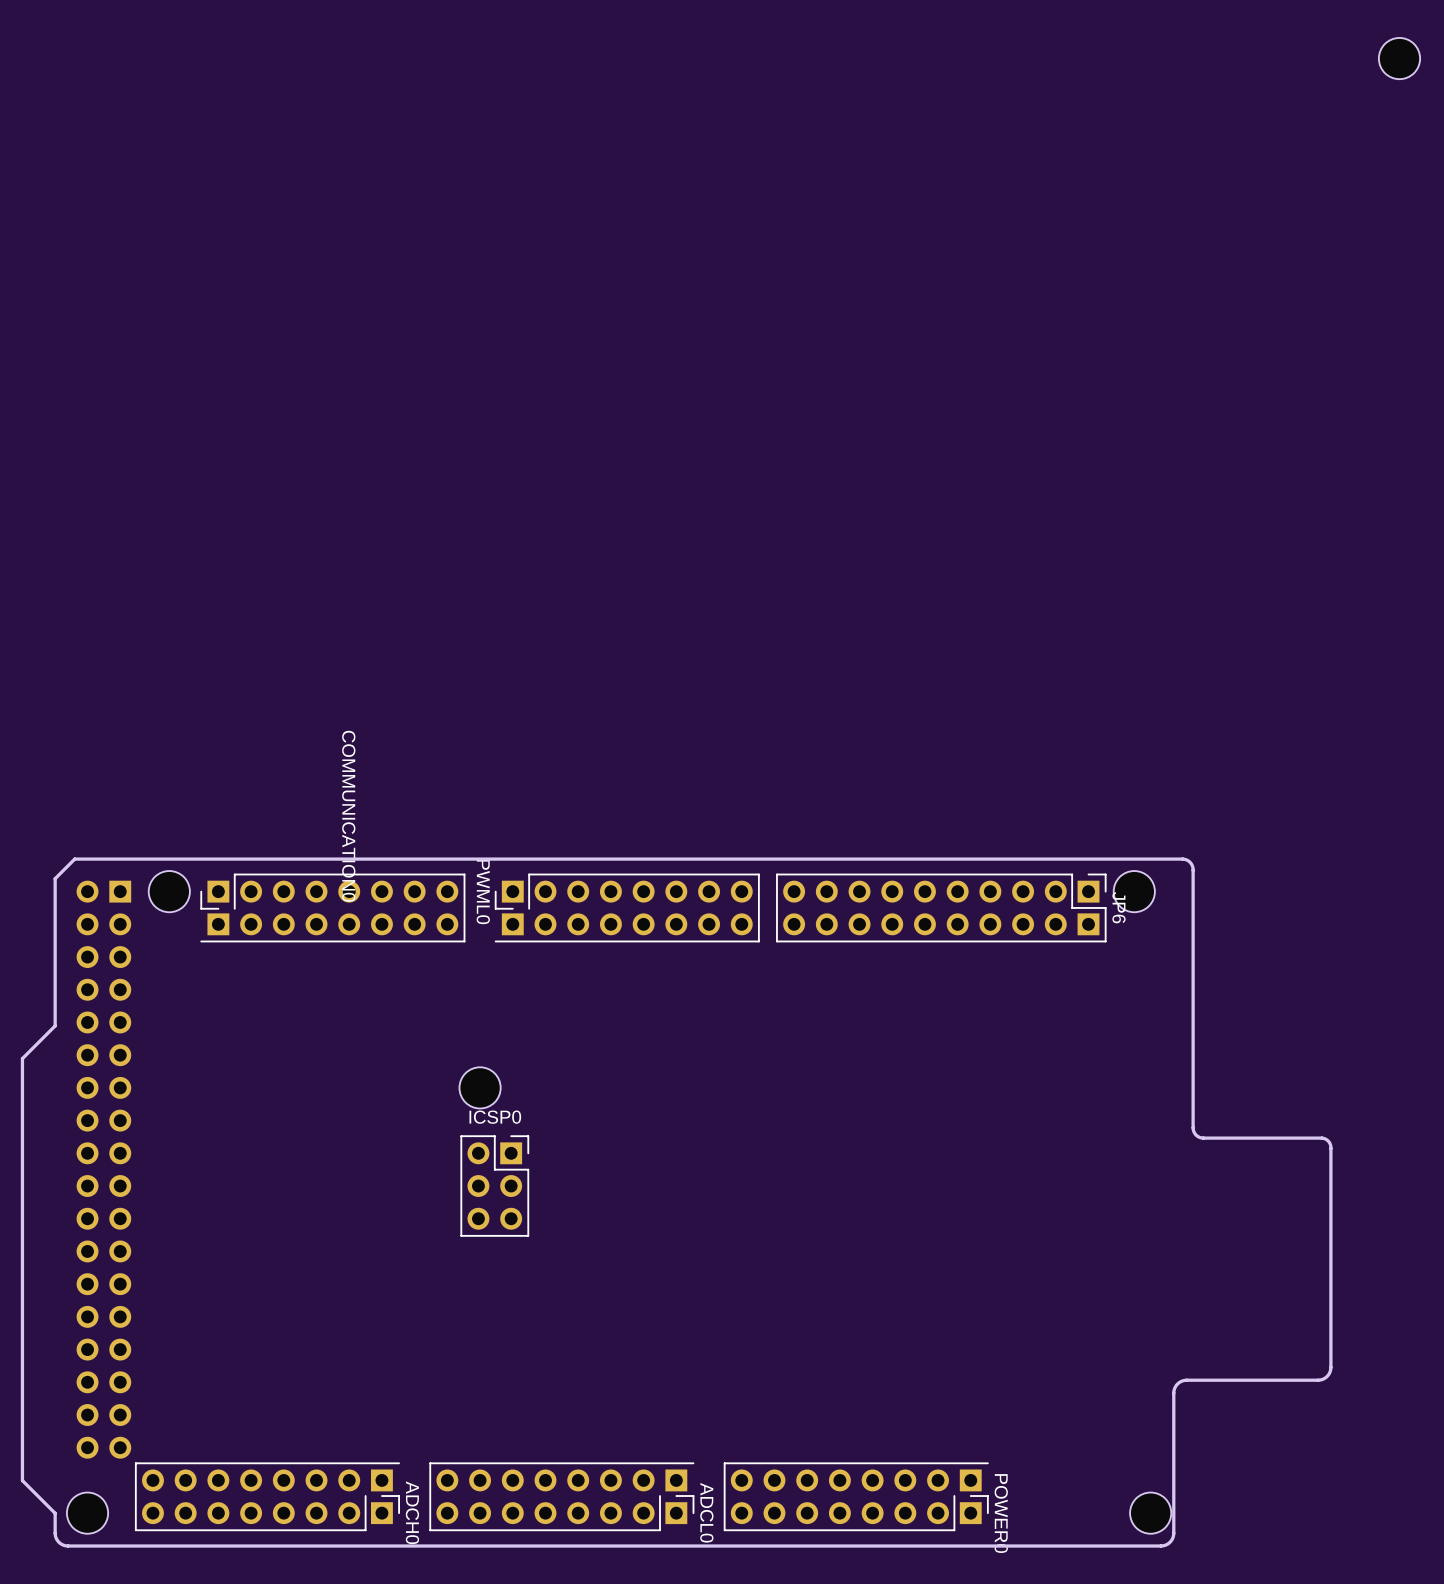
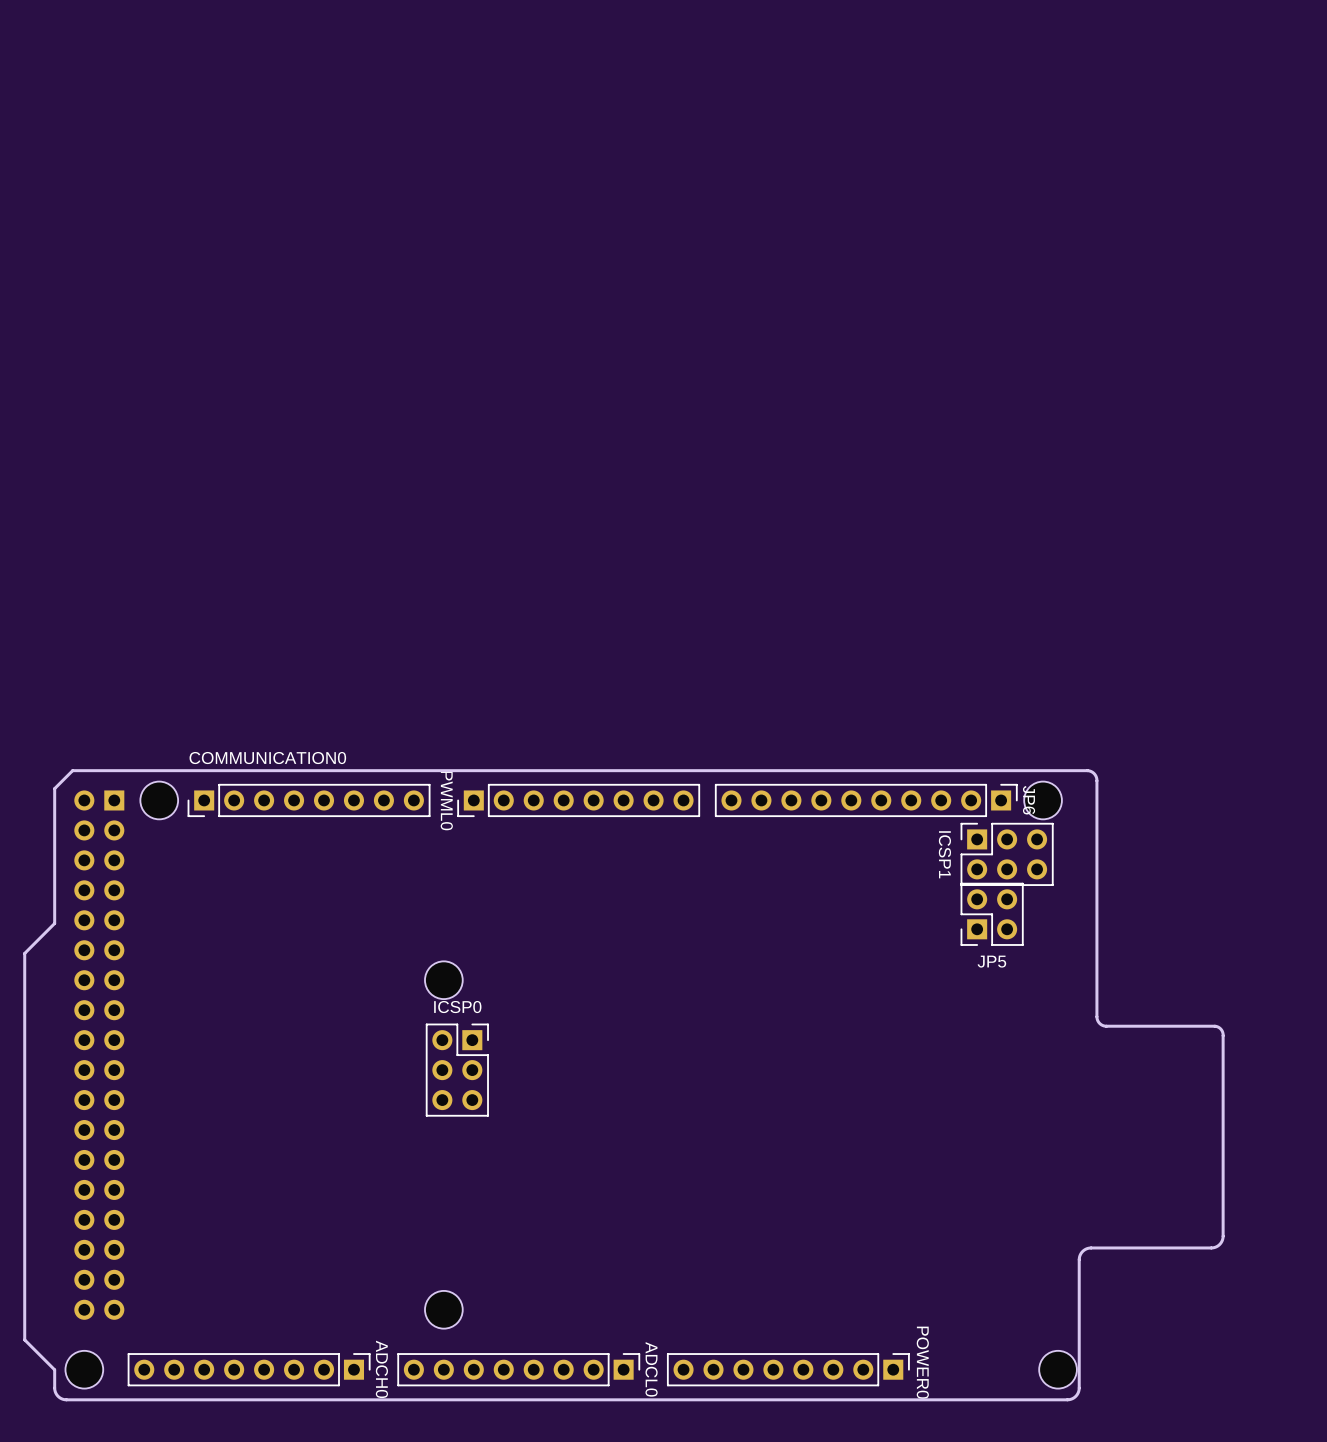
part: (1399, 58) -> none
COMMUNICATION0 name position: COMMUNICATION0 (348, 816) -> COMMUNICATION0 (267, 758)
COMMUNICATION0 footprint: [200, 873, 466, 943] -> [187, 784, 431, 817]
PWML0 footprint: [494, 873, 760, 943] -> [457, 784, 700, 817]
JP6 footprint: [776, 873, 1107, 943] -> [715, 784, 1018, 817]
ICSP1: none -> (1007, 854)
JP5: none -> (992, 914)
part: none -> (443, 1309)
ADCH0 footprint: [135, 1462, 400, 1532] -> [127, 1353, 371, 1387]
ADCL0 footprint: [429, 1462, 695, 1532] -> [397, 1353, 641, 1387]
POWER0 footprint: [723, 1462, 989, 1532] -> [667, 1353, 910, 1387]

